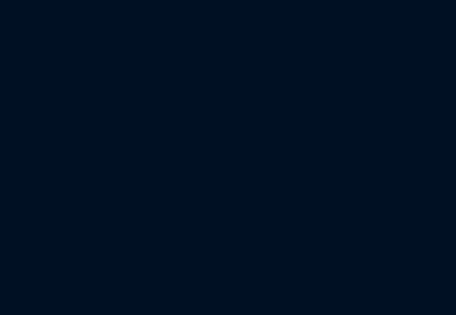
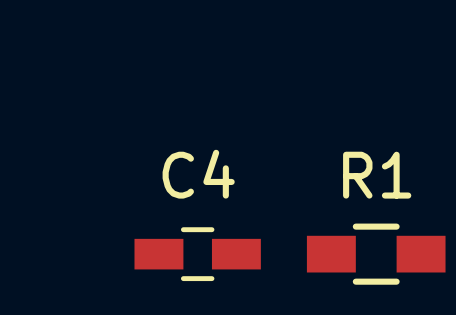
C4: none -> (197, 254)
R1: none -> (376, 254)

